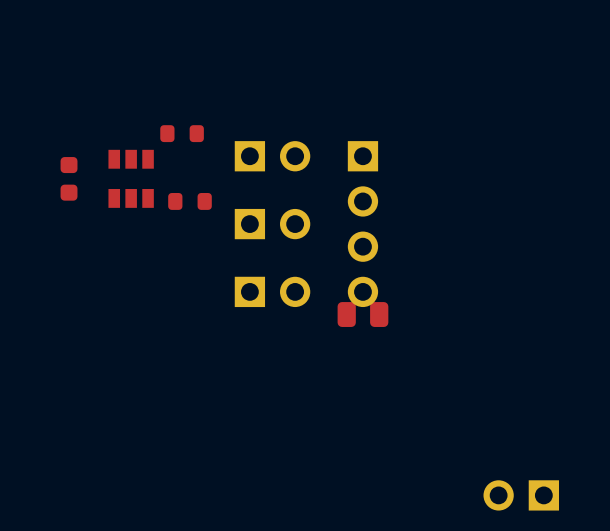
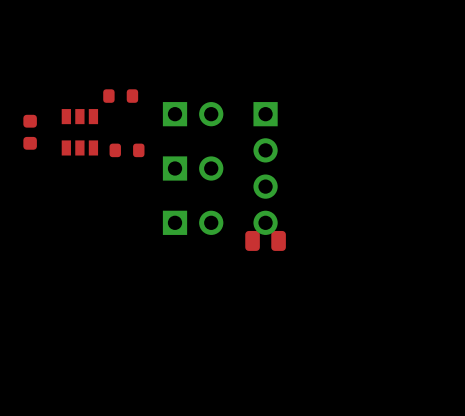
part: (521, 495) -> none

